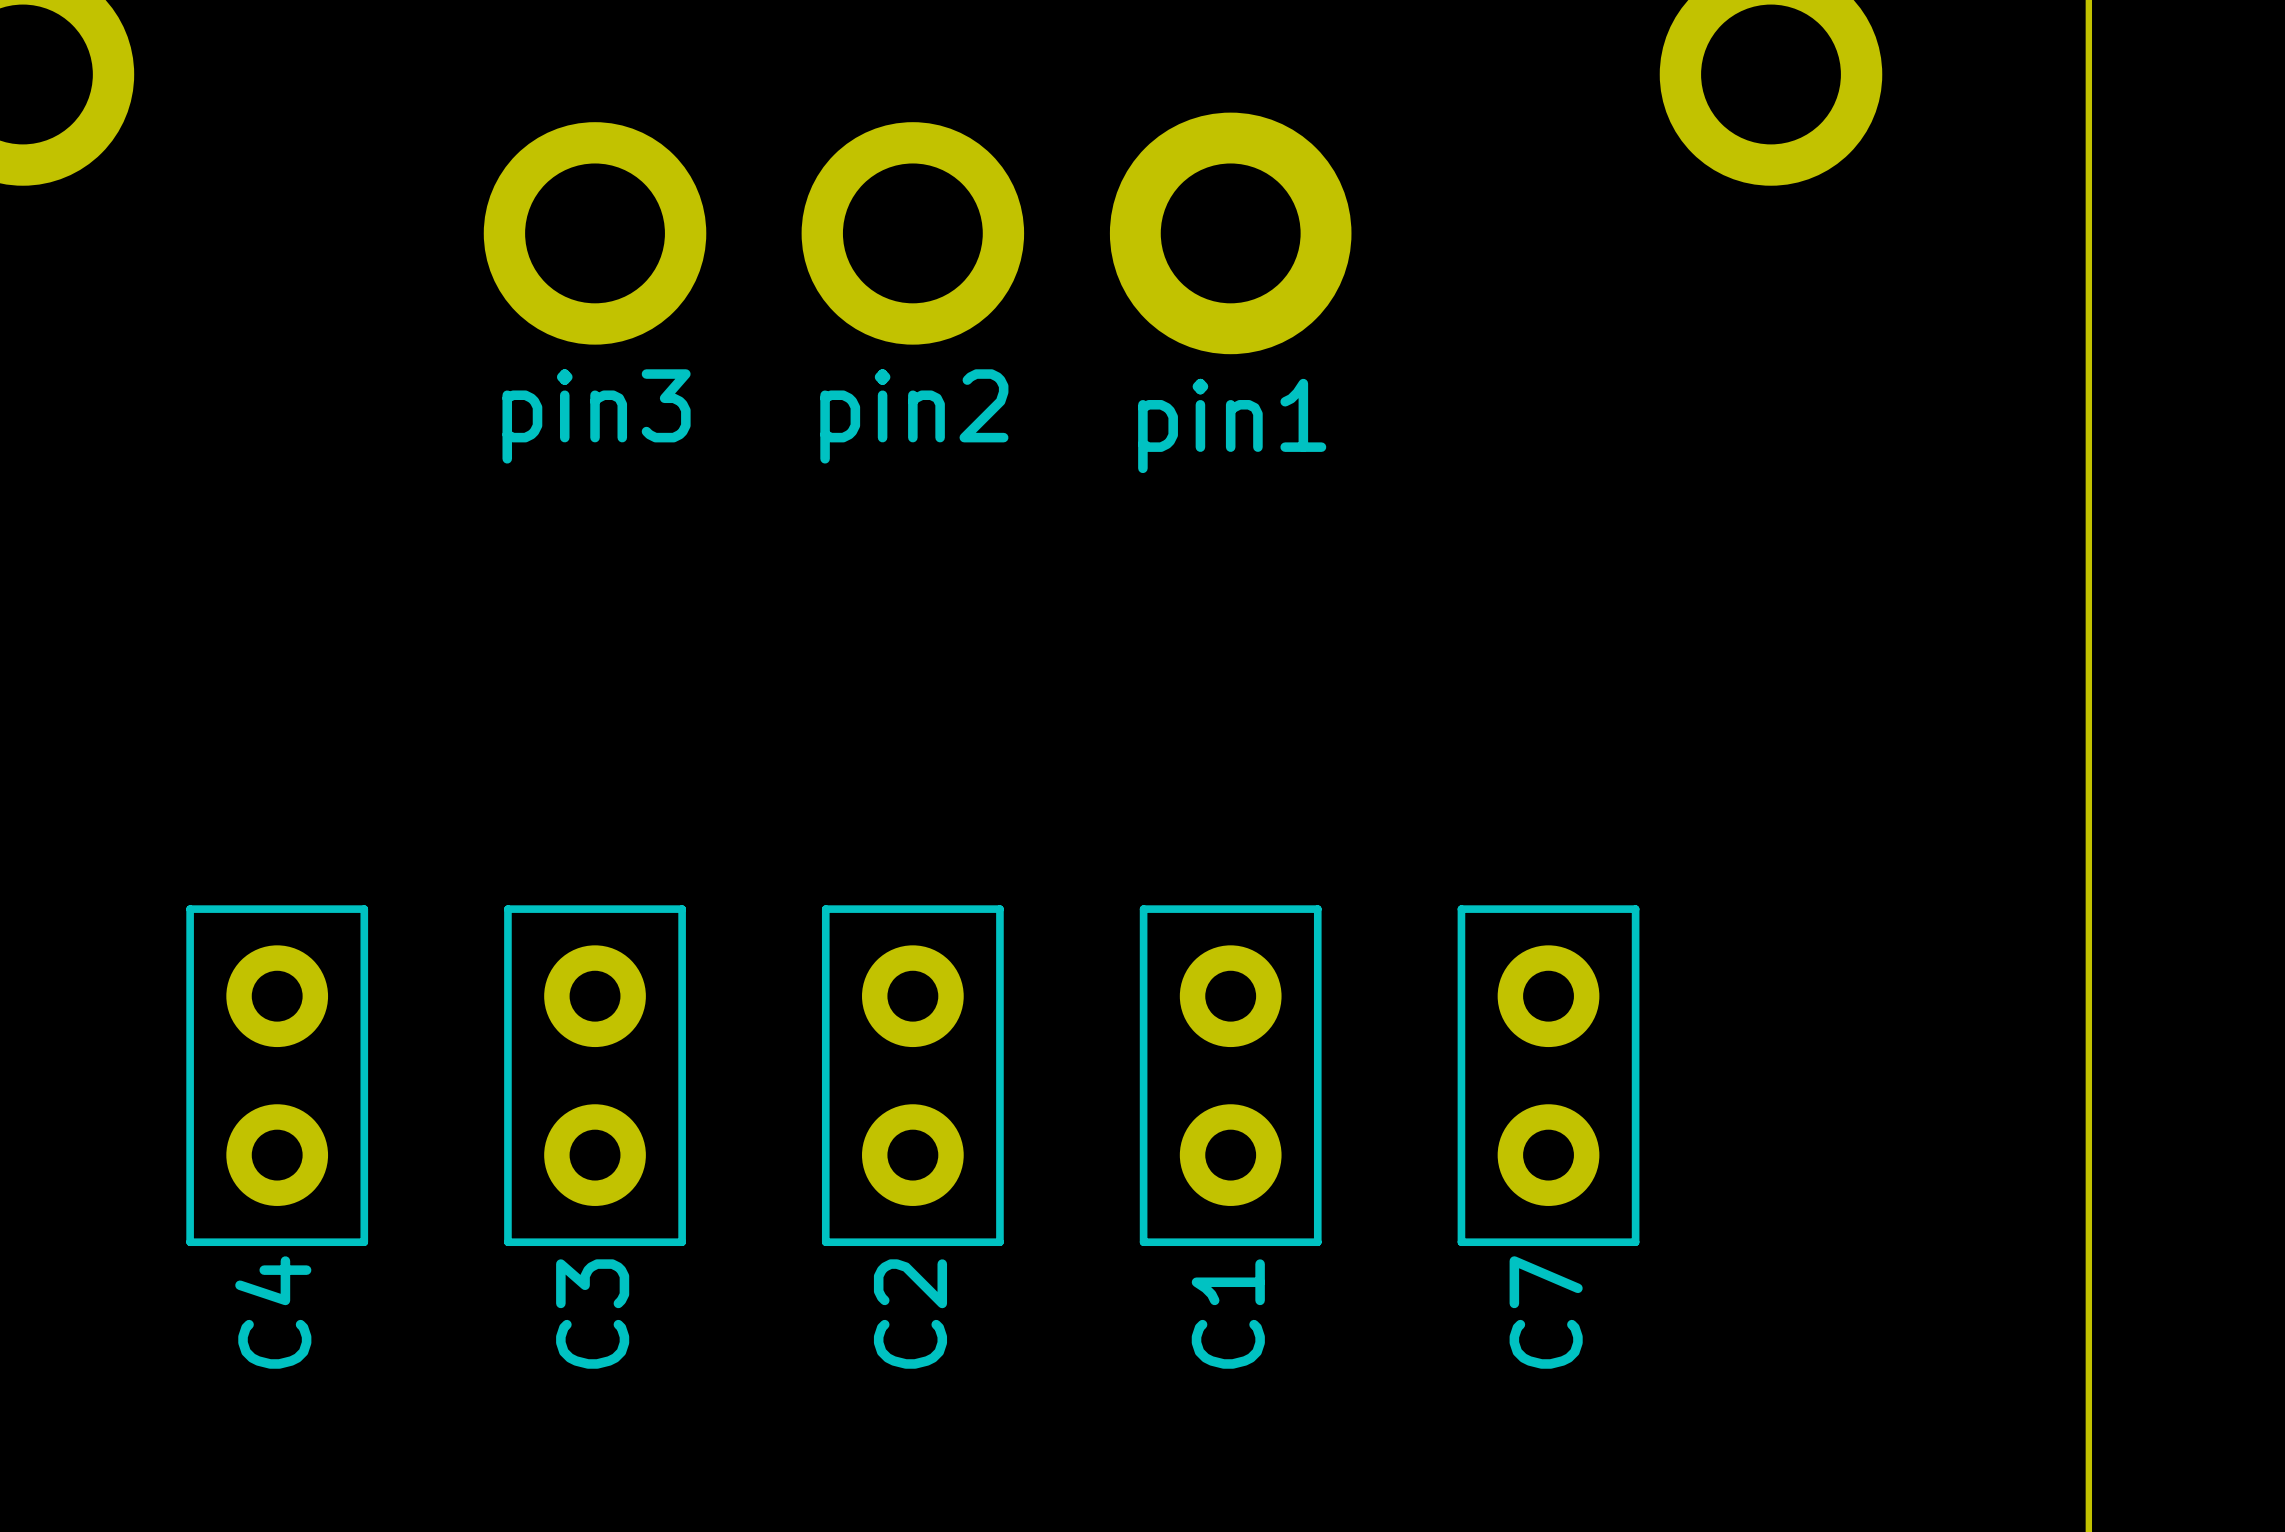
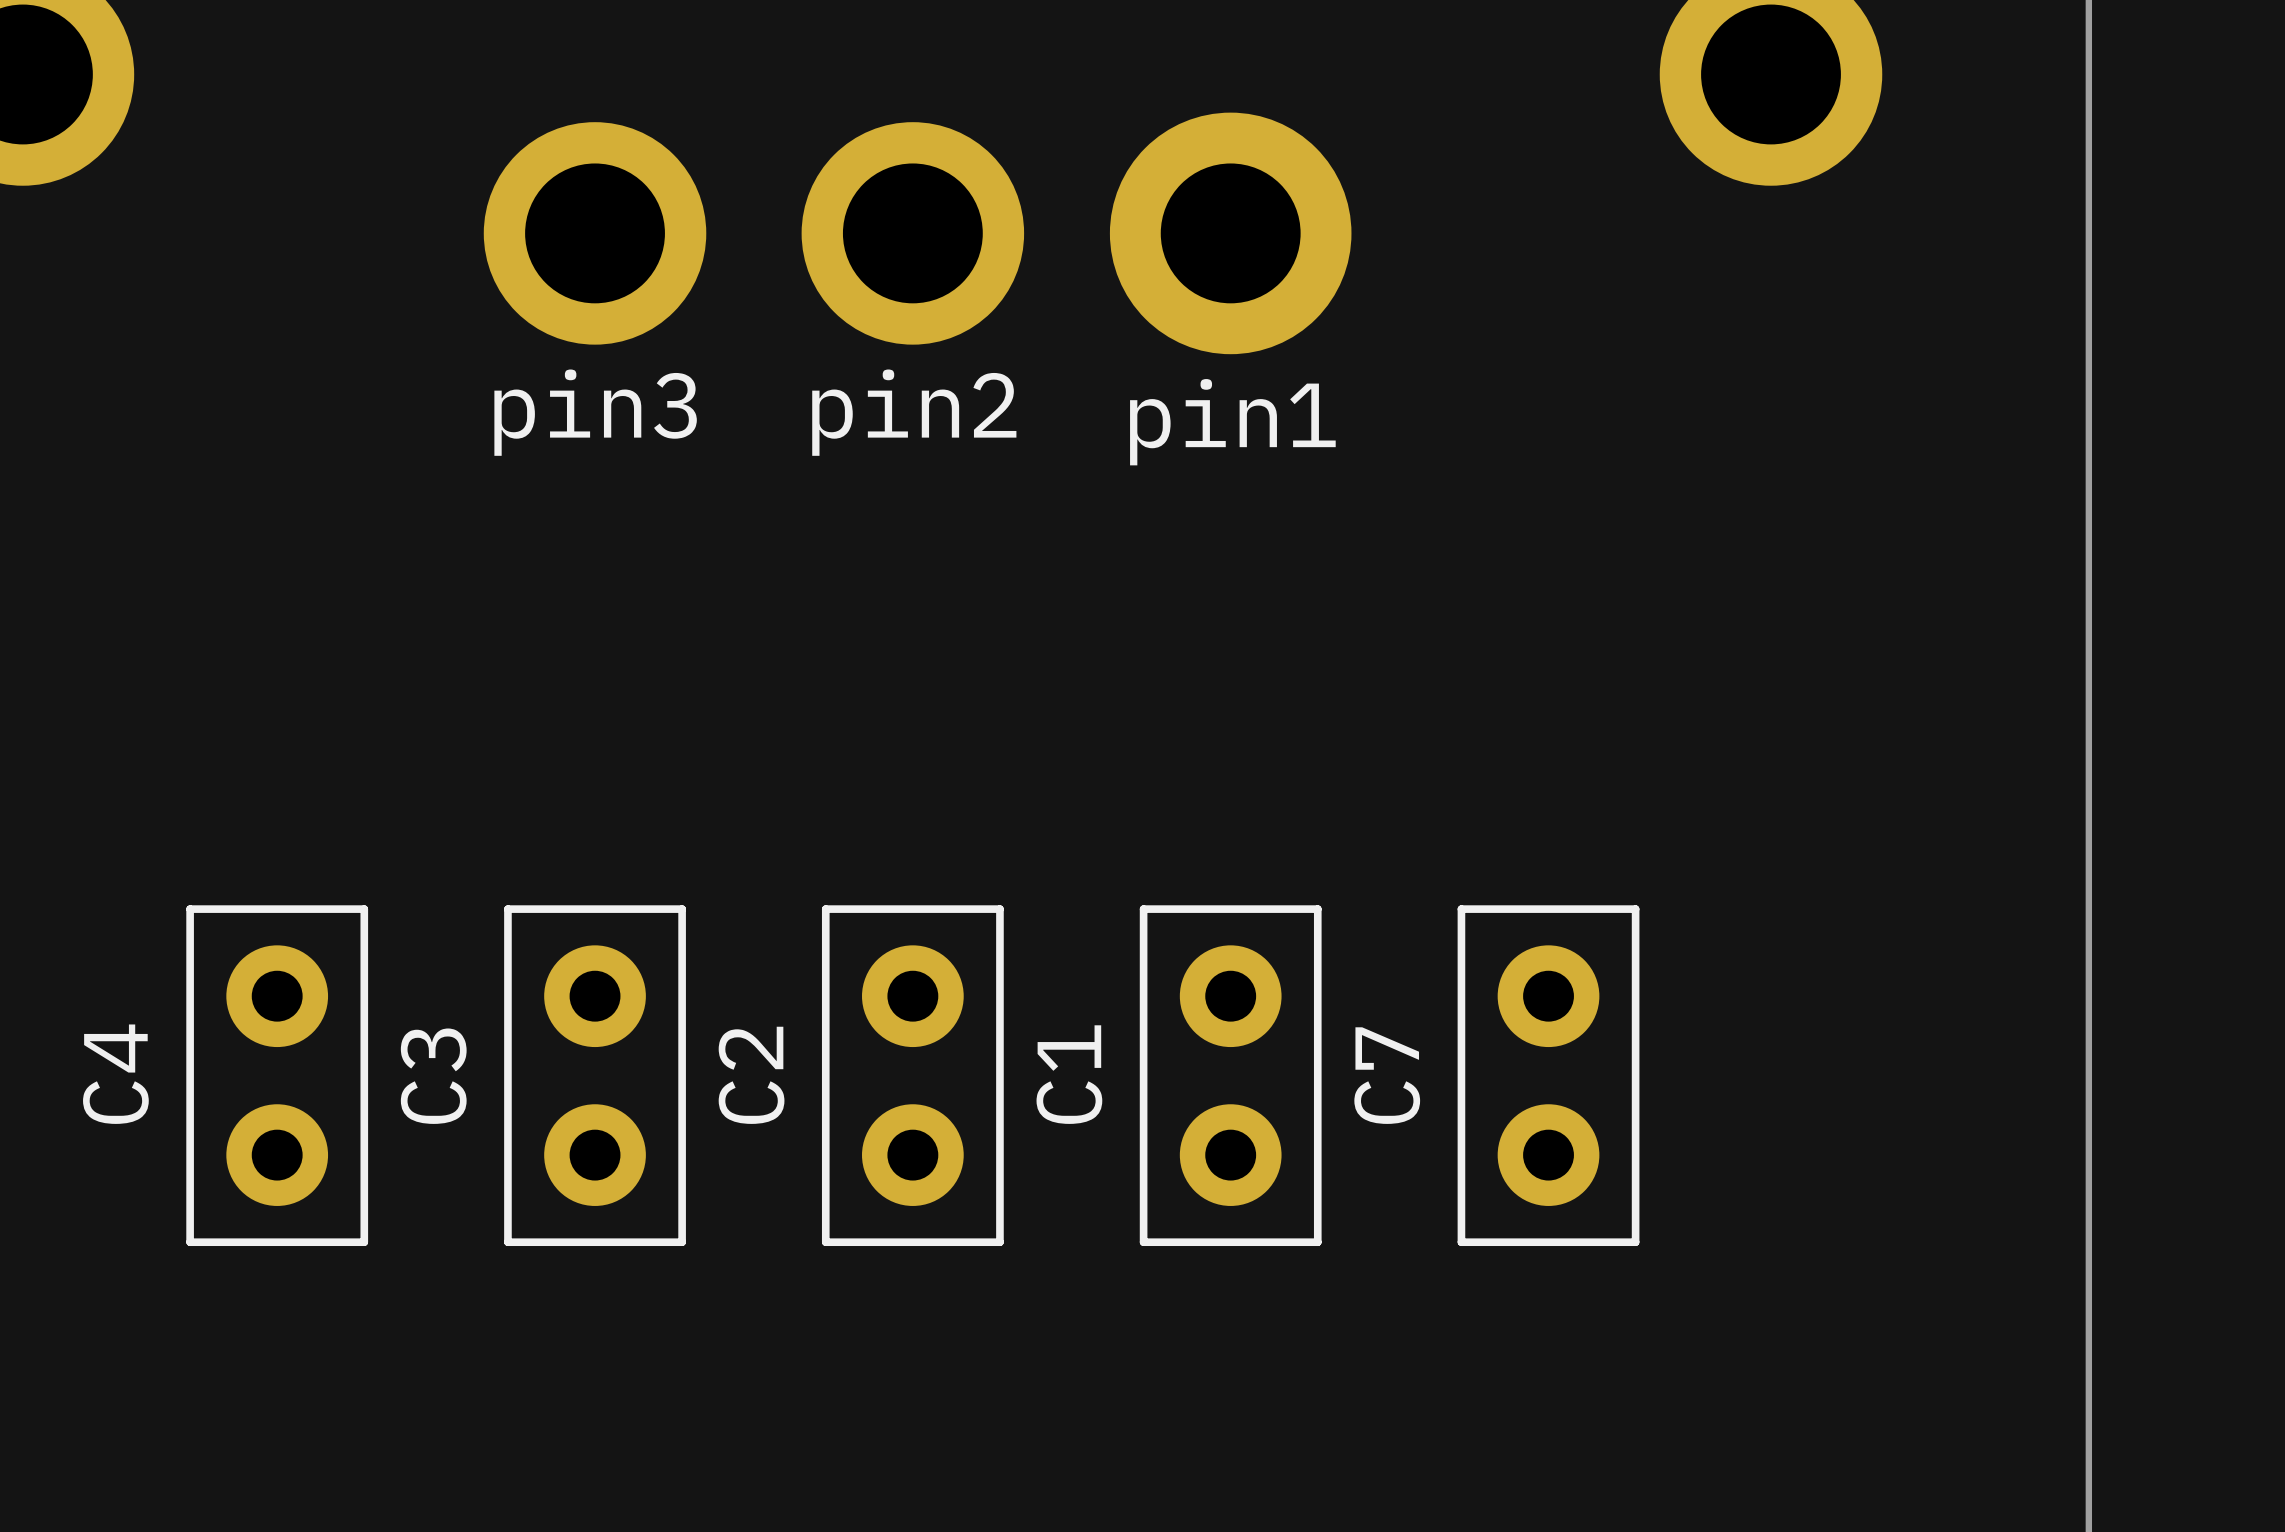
C4 name position: C4 (273, 1312) -> C4 (115, 1074)
C7 name position: C7 (1546, 1312) -> C7 (1387, 1075)
C3 name position: C3 (592, 1314) -> C3 (433, 1076)
C2 name position: C2 (910, 1314) -> C2 (751, 1075)
C1 name position: C1 (1228, 1314) -> C1 (1069, 1074)

